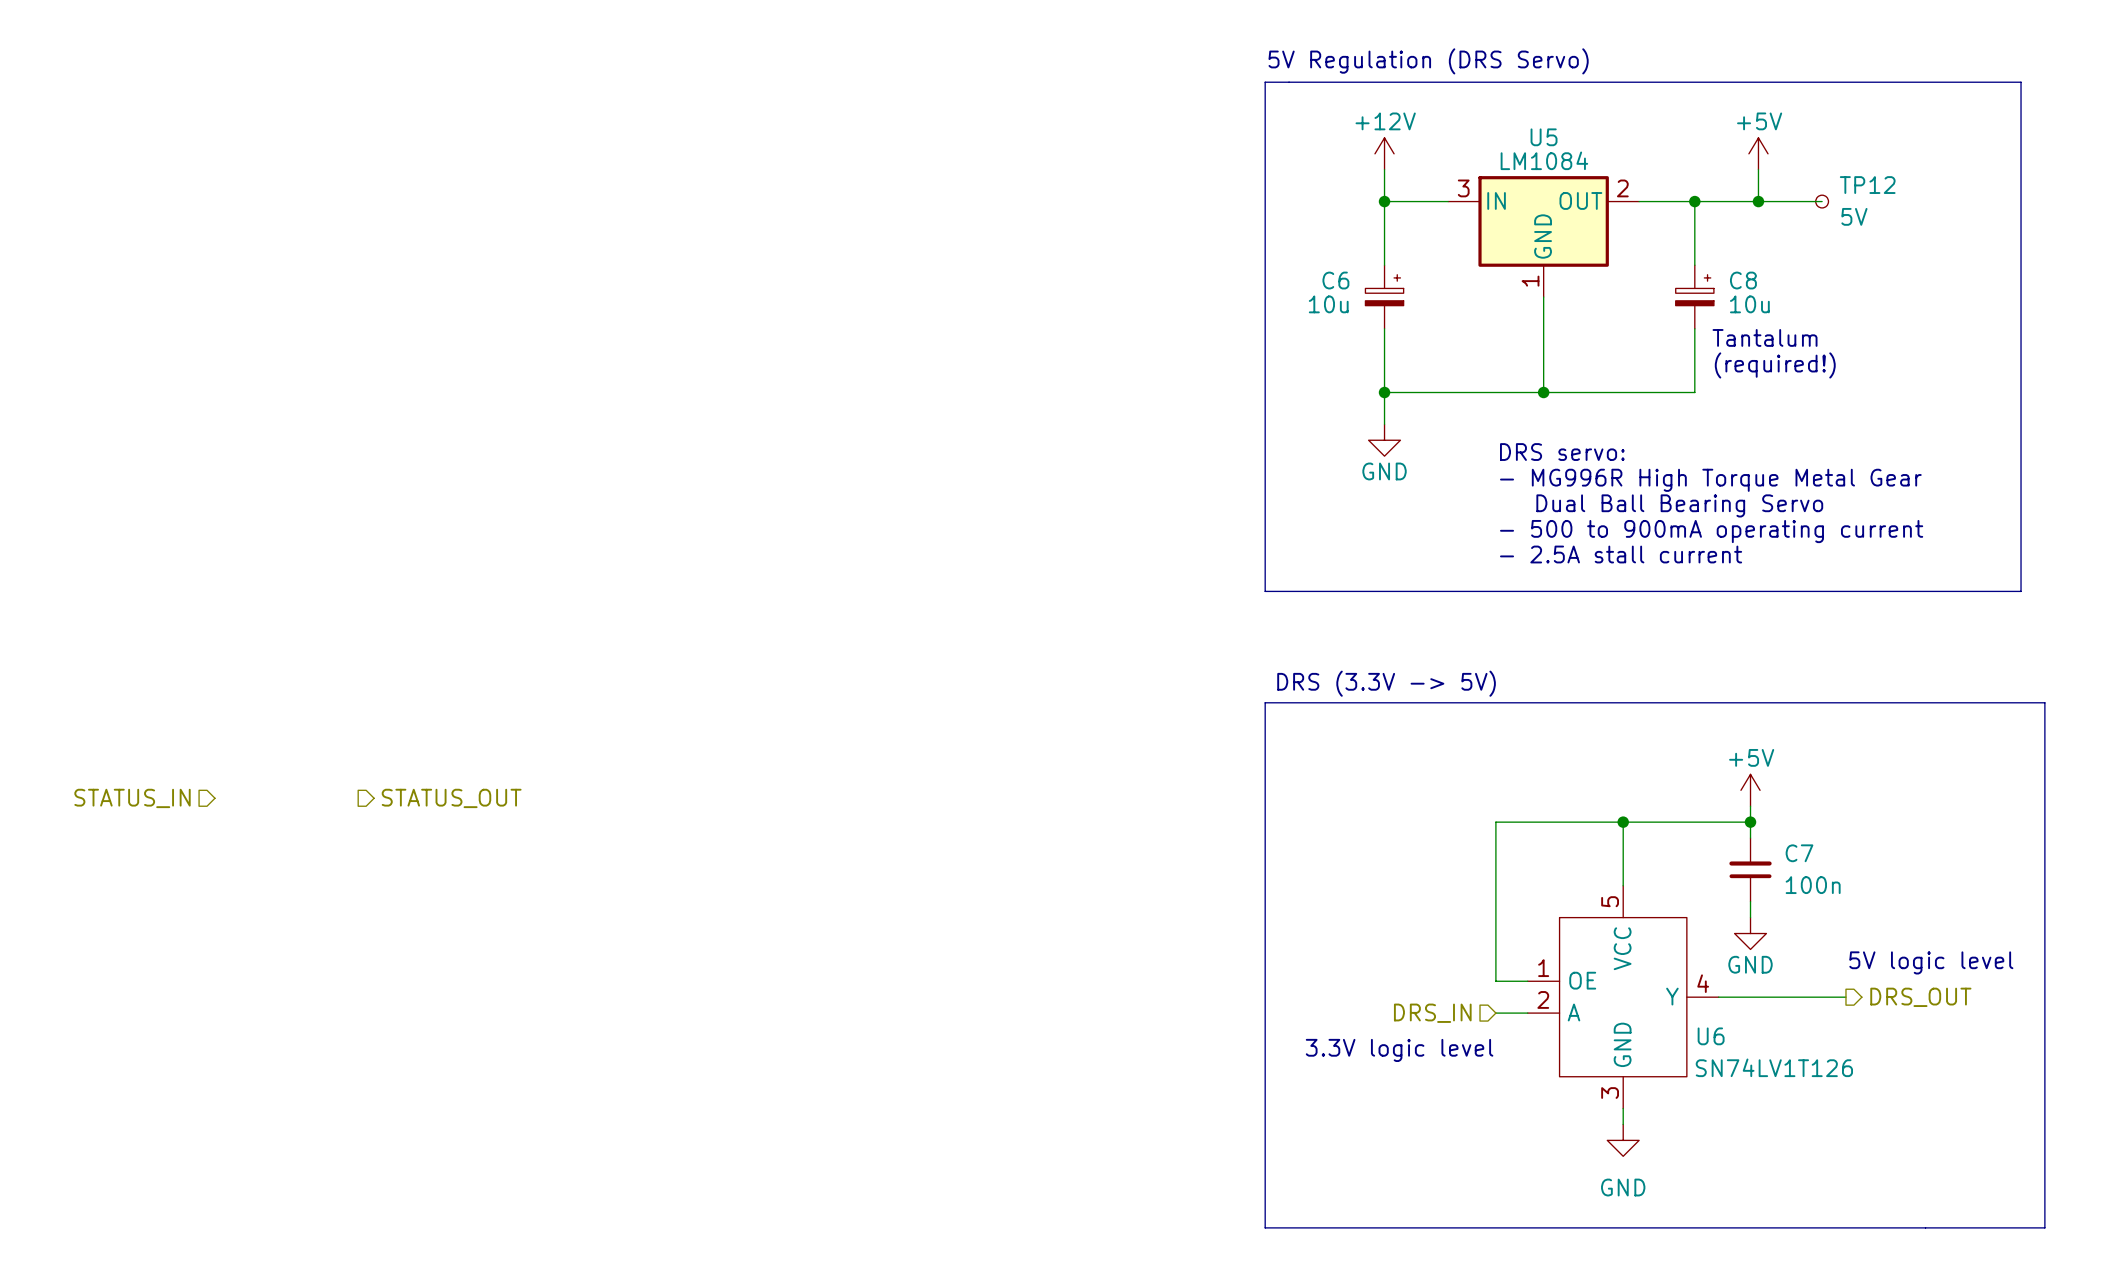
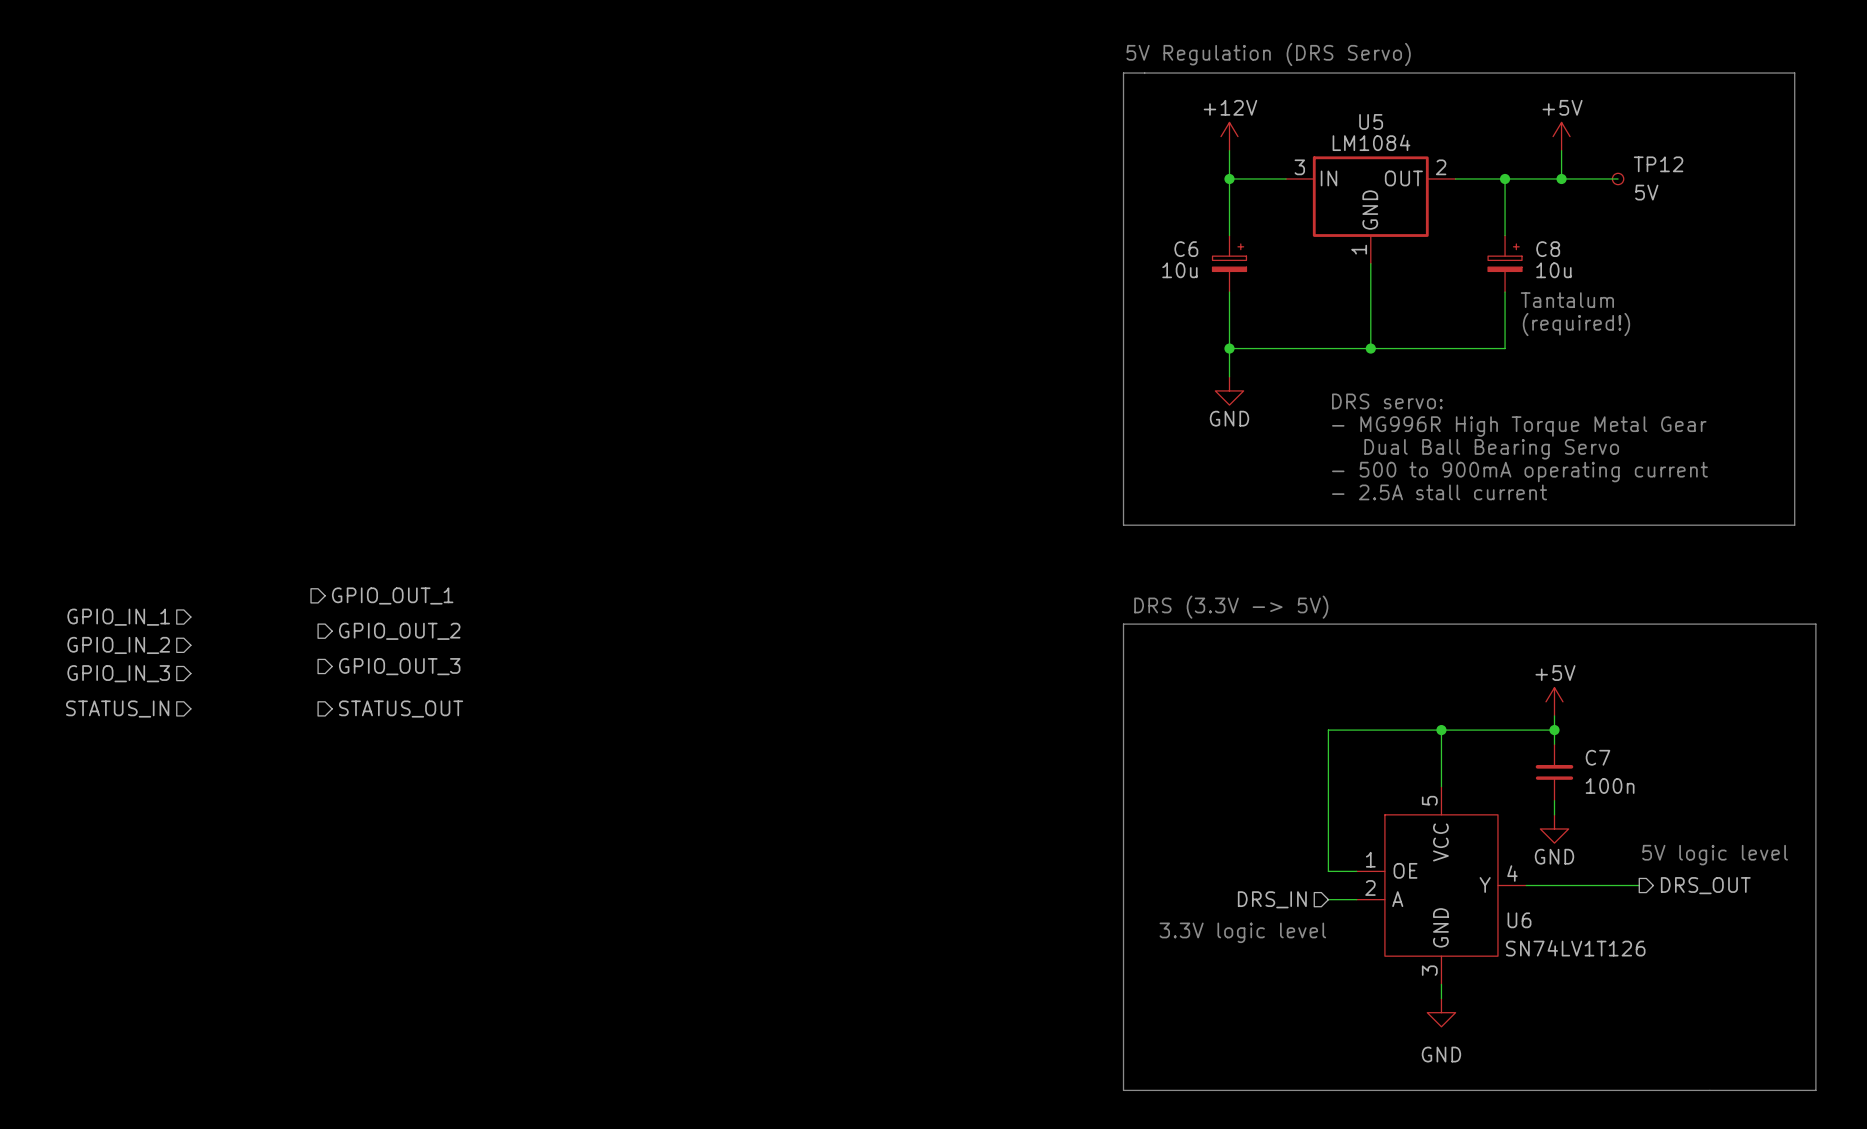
hierarchical label: none -> GPIO_OUT_1 (392, 595)
hierarchical label: none -> GPIO_IN_1 (118, 617)
hierarchical label: none -> GPIO_OUT_2 (399, 631)
hierarchical label: none -> GPIO_IN_2 (118, 645)
hierarchical label: none -> GPIO_OUT_3 (399, 666)
hierarchical label: none -> GPIO_IN_3 (118, 673)

